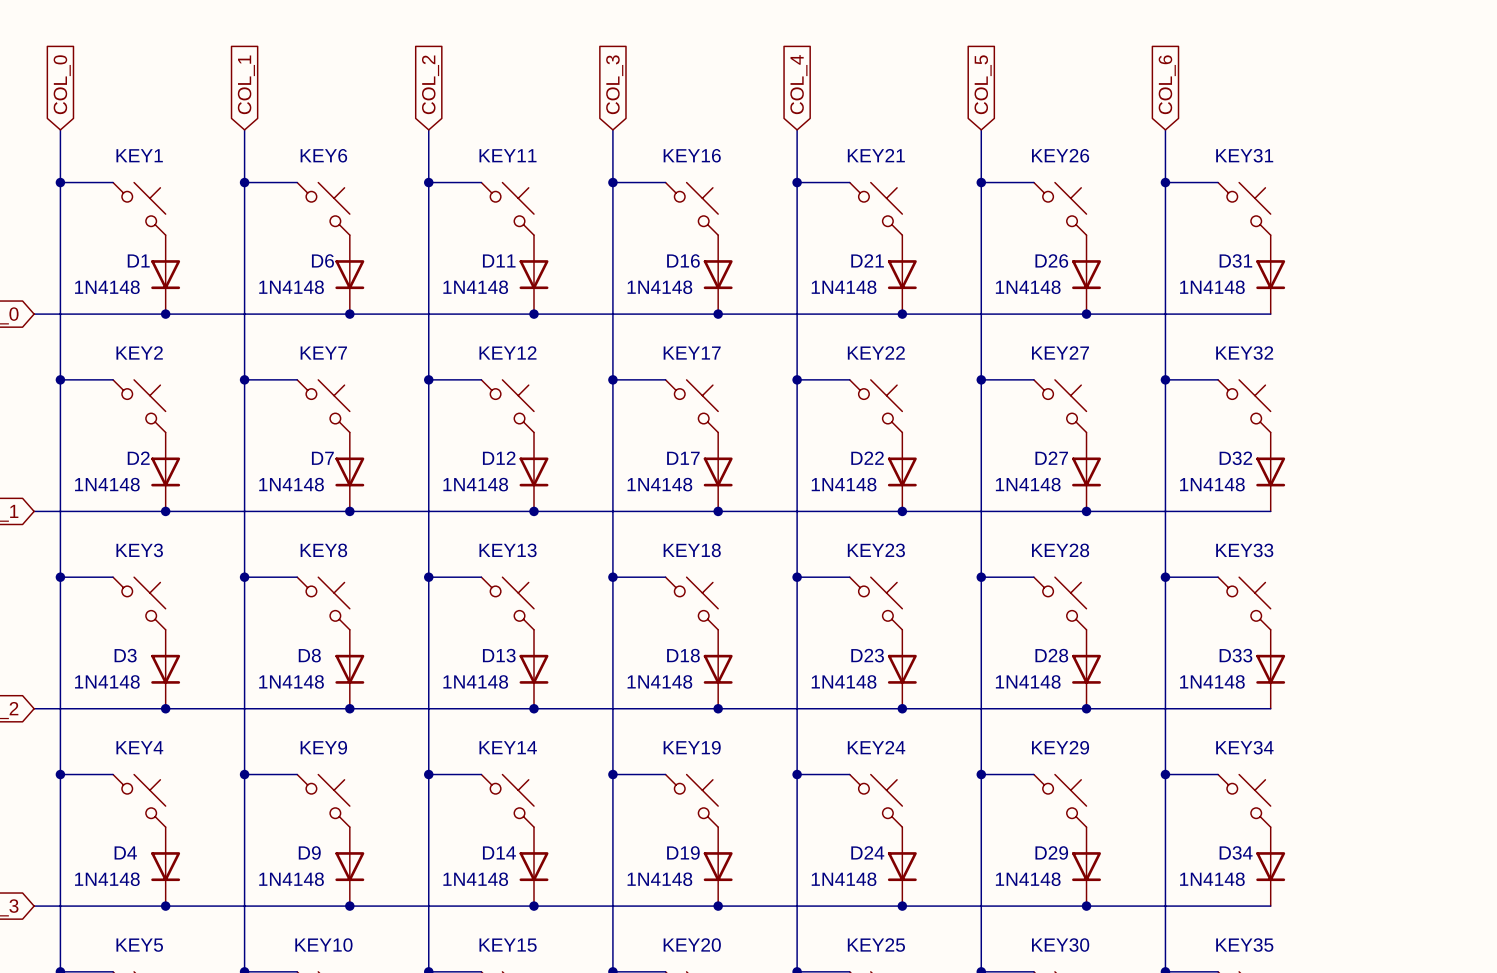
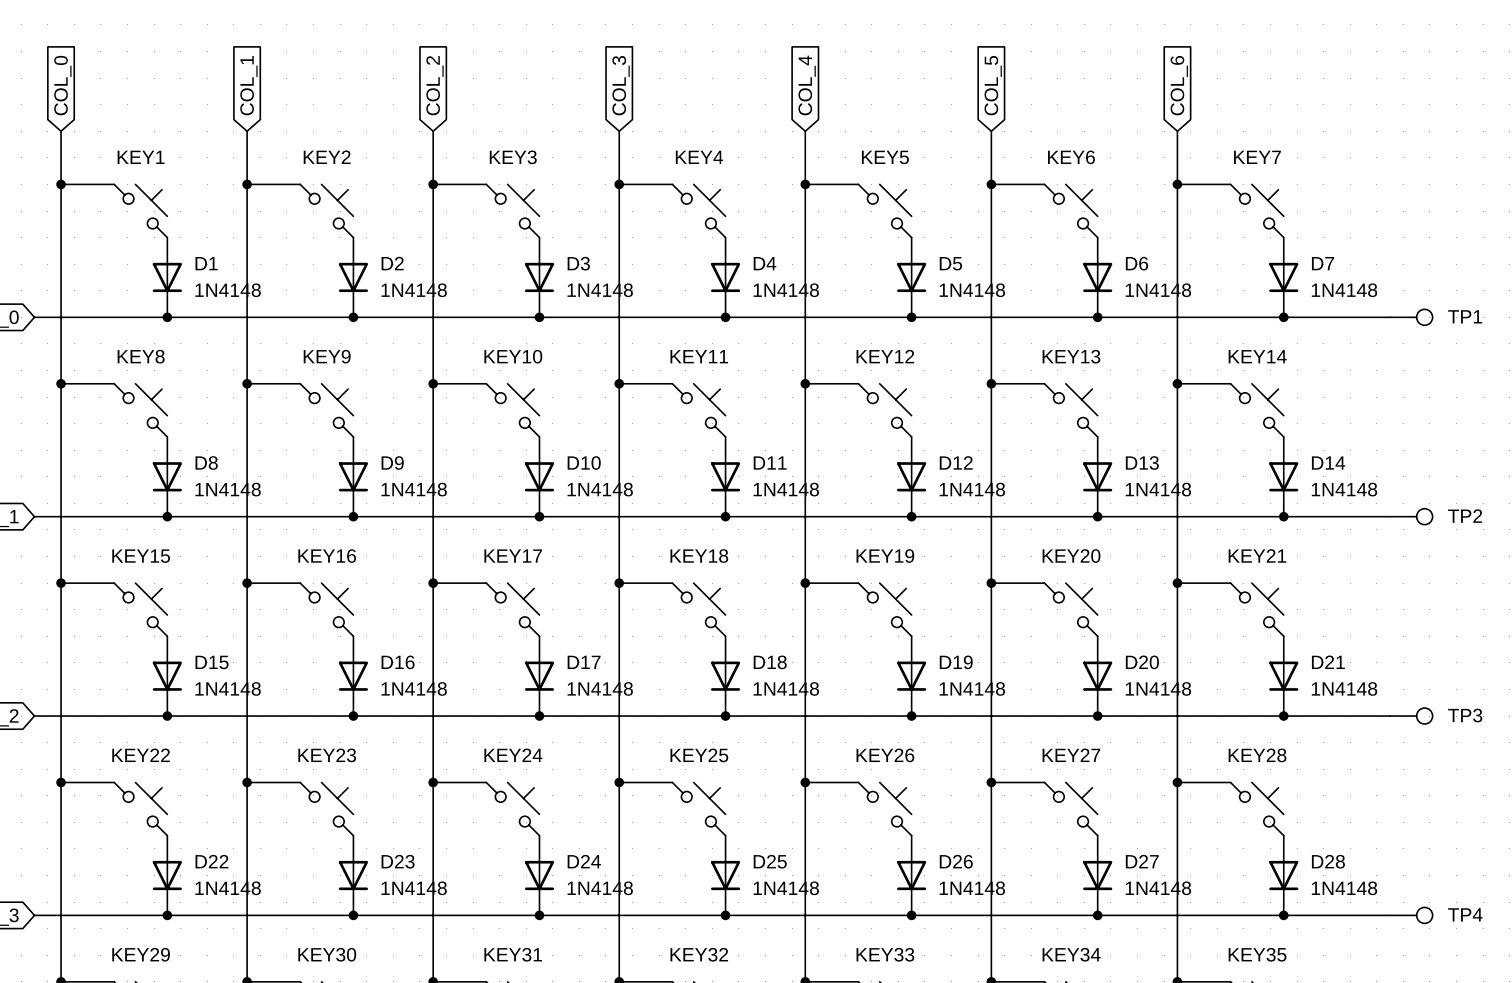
KEY6 name: KEY6 (323, 155) -> KEY2 (327, 157)
KEY11 name: KEY11 (508, 155) -> KEY3 (513, 157)
KEY16 name: KEY16 (692, 155) -> KEY4 (699, 157)
KEY21 name: KEY21 (876, 155) -> KEY5 (885, 157)
KEY26 name: KEY26 (1060, 155) -> KEY6 (1071, 157)
KEY31 name: KEY31 (1244, 155) -> KEY7 (1257, 157)
D1 name position: D1 (138, 260) -> D1 (206, 263)
D6 name: D6 (322, 260) -> D2 (392, 263)
D11 name: D11 (499, 260) -> D3 (578, 263)
D16 name: D16 (683, 260) -> D4 (764, 263)
D21 name: D21 (867, 260) -> D5 (950, 263)
D26 name: D26 (1051, 260) -> D6 (1136, 263)
D31 name: D31 (1235, 260) -> D7 (1322, 263)
D1 value position: 1N4148 (107, 287) -> 1N4148 (228, 290)
D6 value position: 1N4148 (291, 287) -> 1N4148 (414, 290)
D11 value position: 1N4148 (475, 287) -> 1N4148 (600, 290)
D16 value position: 1N4148 (659, 287) -> 1N4148 (786, 290)
D21 value position: 1N4148 (844, 287) -> 1N4148 (972, 290)
D26 value position: 1N4148 (1028, 287) -> 1N4148 (1158, 290)
D31 value position: 1N4148 (1212, 287) -> 1N4148 (1344, 290)
wire: none -> (1283, 317) (1390, 317)
junction: none -> (1283, 317)
TP1: none -> (1411, 317)
KEY2 name: KEY2 (139, 352) -> KEY8 (141, 356)
KEY12 name: KEY12 (507, 352) -> KEY10 (513, 356)
KEY22 name: KEY22 (876, 352) -> KEY12 (885, 356)
KEY27 name: KEY27 (1060, 352) -> KEY13 (1071, 356)
KEY7 name: KEY7 (323, 353) -> KEY9 (327, 356)
KEY17 name: KEY17 (692, 353) -> KEY11 (699, 356)
KEY32 name: KEY32 (1244, 353) -> KEY14 (1257, 356)
D2 name: D2 (138, 458) -> D8 (206, 463)
D7 name: D7 (322, 458) -> D9 (392, 463)
D12 name: D12 (499, 458) -> D10 (584, 463)
D17 name: D17 (683, 458) -> D11 (770, 463)
D22 name: D22 (867, 458) -> D12 (956, 462)
D27 name: D27 (1051, 458) -> D13 (1142, 463)
D32 name: D32 (1235, 458) -> D14 (1328, 463)
D2 value position: 1N4148 (107, 484) -> 1N4148 (228, 489)
D7 value position: 1N4148 (291, 484) -> 1N4148 (414, 489)
D12 value position: 1N4148 (475, 484) -> 1N4148 (600, 489)
D17 value position: 1N4148 (659, 484) -> 1N4148 (786, 489)
D22 value position: 1N4148 (844, 484) -> 1N4148 (972, 489)
D27 value position: 1N4148 (1028, 484) -> 1N4148 (1158, 489)
D32 value position: 1N4148 (1212, 484) -> 1N4148 (1344, 489)
wire: none -> (1283, 516) (1390, 516)
junction: none -> (1283, 516)
TP2: none -> (1411, 516)
KEY3 name: KEY3 (139, 550) -> KEY15 (141, 556)
KEY8 name: KEY8 (323, 550) -> KEY16 (327, 556)
KEY13 name: KEY13 (508, 550) -> KEY17 (513, 556)
KEY23 name: KEY23 (876, 550) -> KEY19 (885, 556)
KEY28 name: KEY28 (1060, 550) -> KEY20 (1071, 556)
KEY33 name: KEY33 (1244, 550) -> KEY21 (1257, 555)
D3 name: D3 (125, 655) -> D15 (212, 662)
D8 name: D8 (309, 655) -> D16 (398, 662)
D13 name: D13 (499, 655) -> D17 (584, 662)
D18 name position: D18 (683, 655) -> D18 (770, 662)
D23 name: D23 (867, 655) -> D19 (956, 662)
D28 name: D28 (1051, 655) -> D20 (1142, 662)
D33 name: D33 (1235, 655) -> D21 (1328, 662)
D3 value position: 1N4148 (107, 681) -> 1N4148 (228, 688)
D8 value position: 1N4148 (291, 681) -> 1N4148 (414, 688)
D13 value position: 1N4148 (475, 681) -> 1N4148 (600, 688)
D18 value position: 1N4148 (659, 681) -> 1N4148 (786, 688)
D23 value position: 1N4148 (844, 681) -> 1N4148 (972, 688)
D28 value position: 1N4148 (1028, 681) -> 1N4148 (1158, 688)
D33 value position: 1N4148 (1212, 681) -> 1N4148 (1344, 688)
wire: none -> (1283, 716) (1390, 716)
junction: none -> (1283, 716)
TP3: none -> (1411, 716)
KEY4 name: KEY4 (139, 747) -> KEY22 (141, 755)
KEY9 name: KEY9 (323, 747) -> KEY23 (327, 755)
KEY14 name: KEY14 (508, 747) -> KEY24 (513, 755)
KEY19 name: KEY19 (692, 747) -> KEY25 (699, 755)
KEY24 name: KEY24 (876, 747) -> KEY26 (885, 755)
KEY29 name: KEY29 (1060, 747) -> KEY27 (1071, 755)
KEY34 name: KEY34 (1244, 747) -> KEY28 (1257, 755)
D4 name: D4 (125, 852) -> D22 (211, 861)
D9 name: D9 (309, 852) -> D23 (398, 861)
D14 name: D14 (499, 852) -> D24 (584, 861)
D19 name: D19 (683, 852) -> D25 (770, 861)
D24 name: D24 (867, 852) -> D26 (956, 861)
D29 name: D29 (1051, 852) -> D27 (1142, 861)
D34 name: D34 (1236, 852) -> D28 (1328, 861)
D4 value position: 1N4148 (107, 879) -> 1N4148 (228, 888)
D9 value position: 1N4148 (291, 879) -> 1N4148 (414, 888)
D14 value position: 1N4148 (475, 879) -> 1N4148 (600, 888)
D19 value position: 1N4148 (659, 879) -> 1N4148 (786, 888)
D24 value position: 1N4148 (844, 879) -> 1N4148 (972, 888)
D29 value position: 1N4148 (1028, 879) -> 1N4148 (1158, 888)
D34 value position: 1N4148 (1212, 879) -> 1N4148 (1344, 888)
wire: none -> (1283, 915) (1390, 915)
junction: none -> (1283, 915)
TP4: none -> (1411, 915)
KEY5 name: KEY5 (139, 945) -> KEY29 (141, 954)
KEY10 name: KEY10 (323, 945) -> KEY30 (327, 954)
KEY15 name: KEY15 (508, 945) -> KEY31 (513, 954)
KEY20 name: KEY20 (692, 945) -> KEY32 (699, 954)
KEY25 name: KEY25 (876, 945) -> KEY33 (885, 954)
KEY30 name: KEY30 (1060, 945) -> KEY34 (1071, 954)

